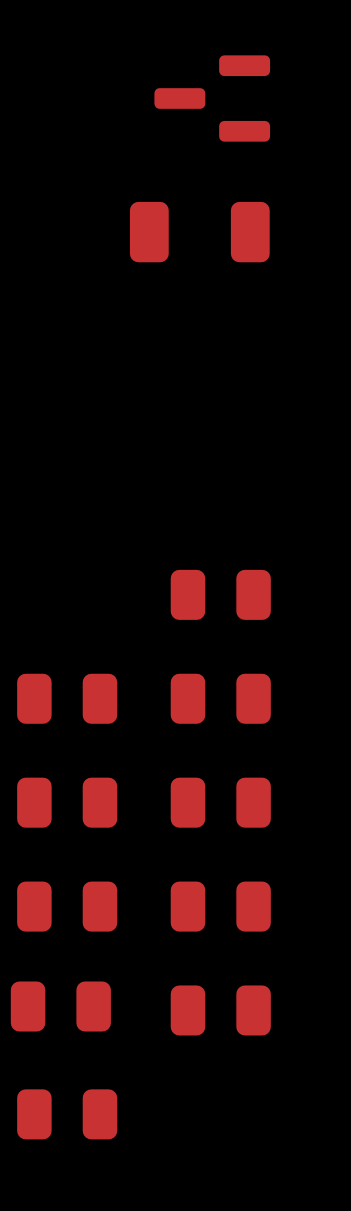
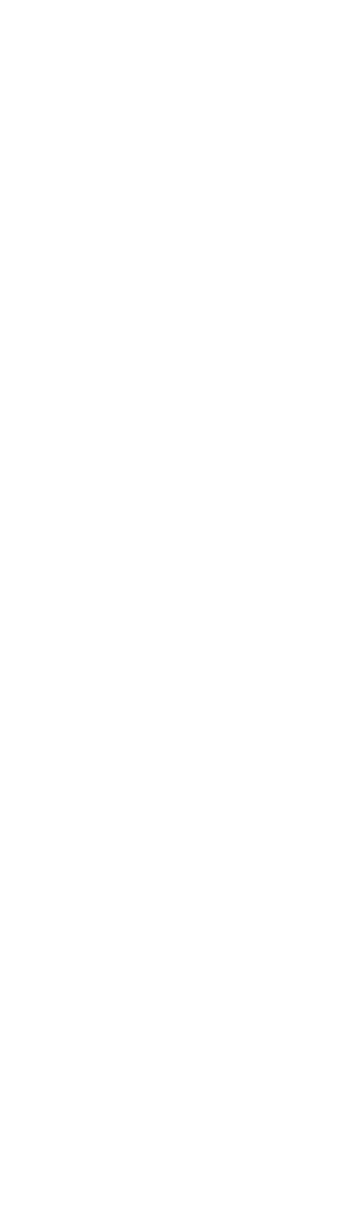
part: (212, 98) -> none
part: (199, 232) -> none
part: (220, 594) -> none
part: (67, 698) -> none
part: (220, 698) -> none
part: (67, 802) -> none
part: (220, 802) -> none
part: (67, 906) -> none
part: (220, 906) -> none
part: (60, 1006) -> none
part: (220, 1010) -> none
part: (67, 1114) -> none

